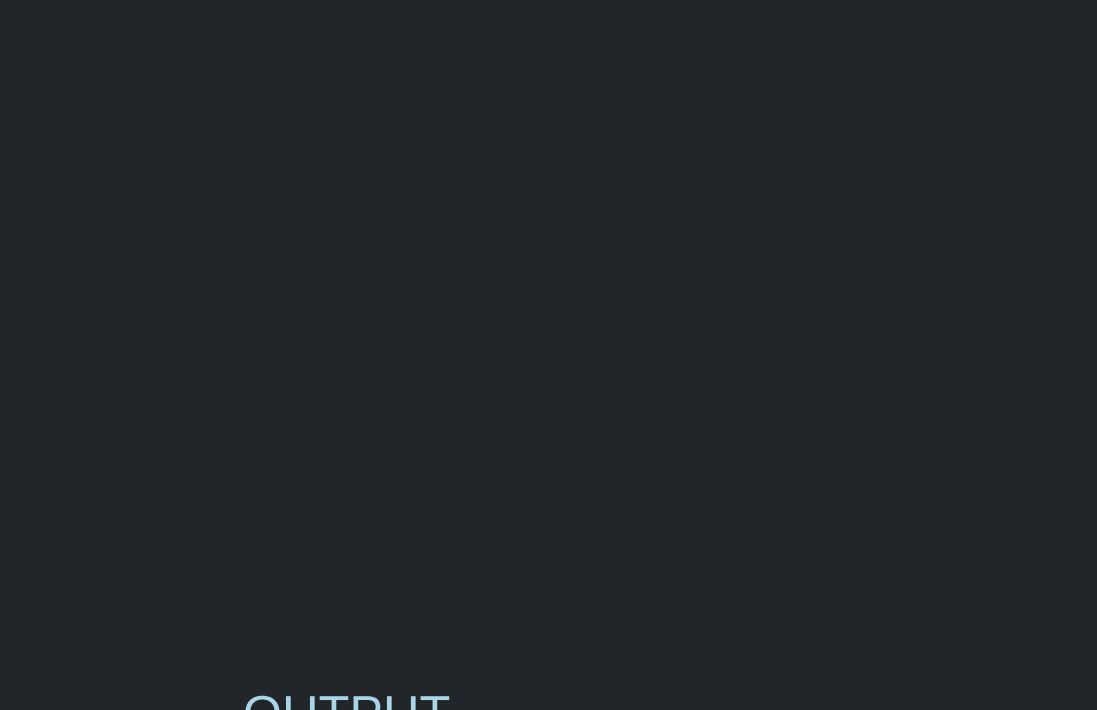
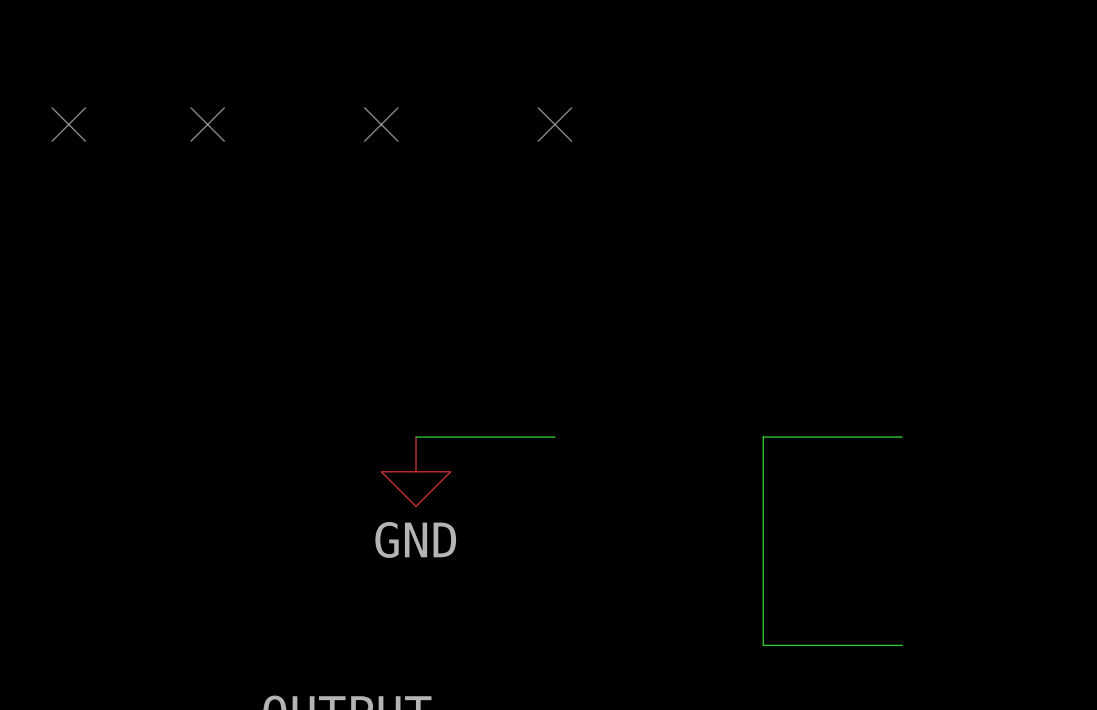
no-connect mark: none -> (68, 124)
no-connect mark: none -> (207, 124)
no-connect mark: none -> (381, 124)
no-connect mark: none -> (554, 124)
wire: none -> (416, 437) (554, 437)
wire: none -> (902, 437) (763, 437) (763, 645) (902, 645)
power symbol: none -> GND (416, 471)

